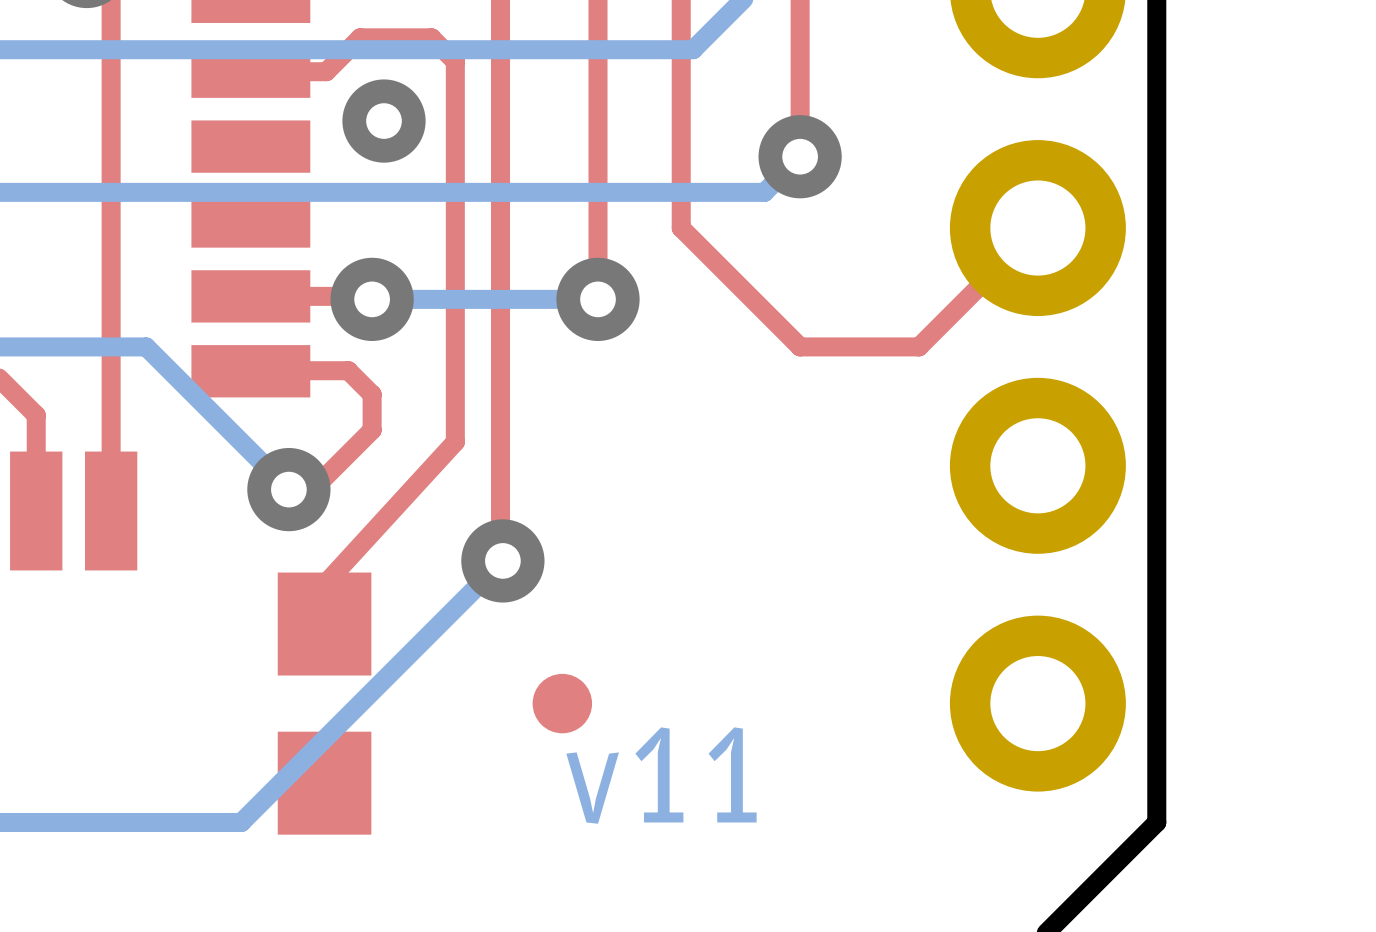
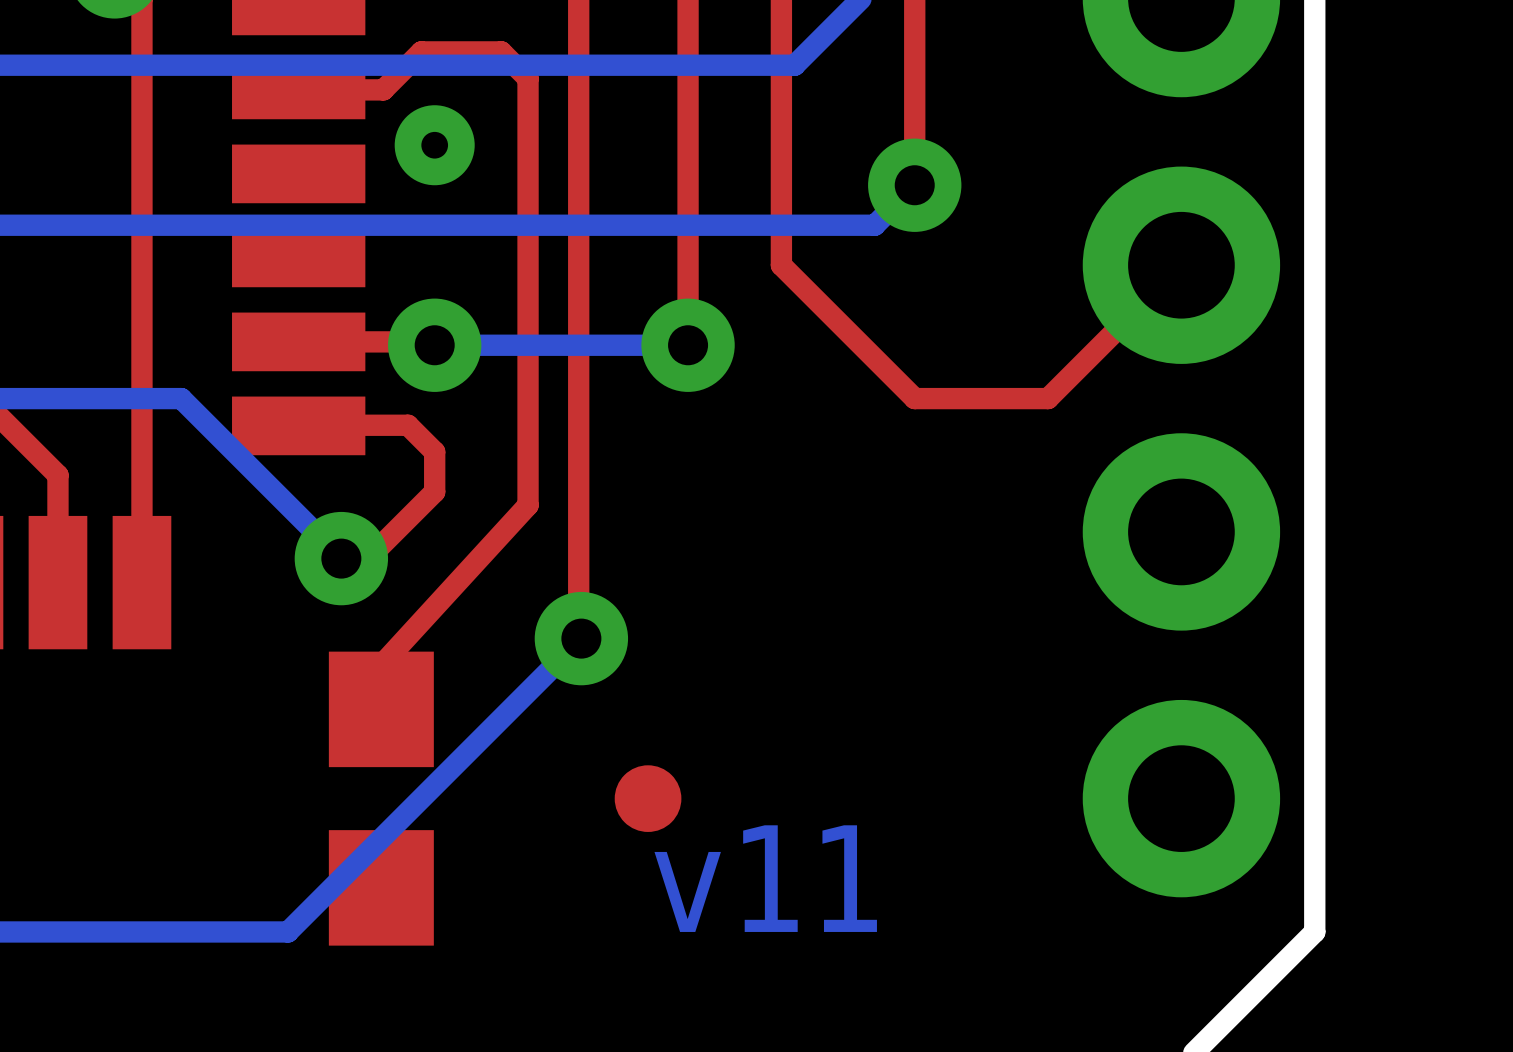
via size: [342, 79, 426, 163] -> [394, 105, 475, 186]

